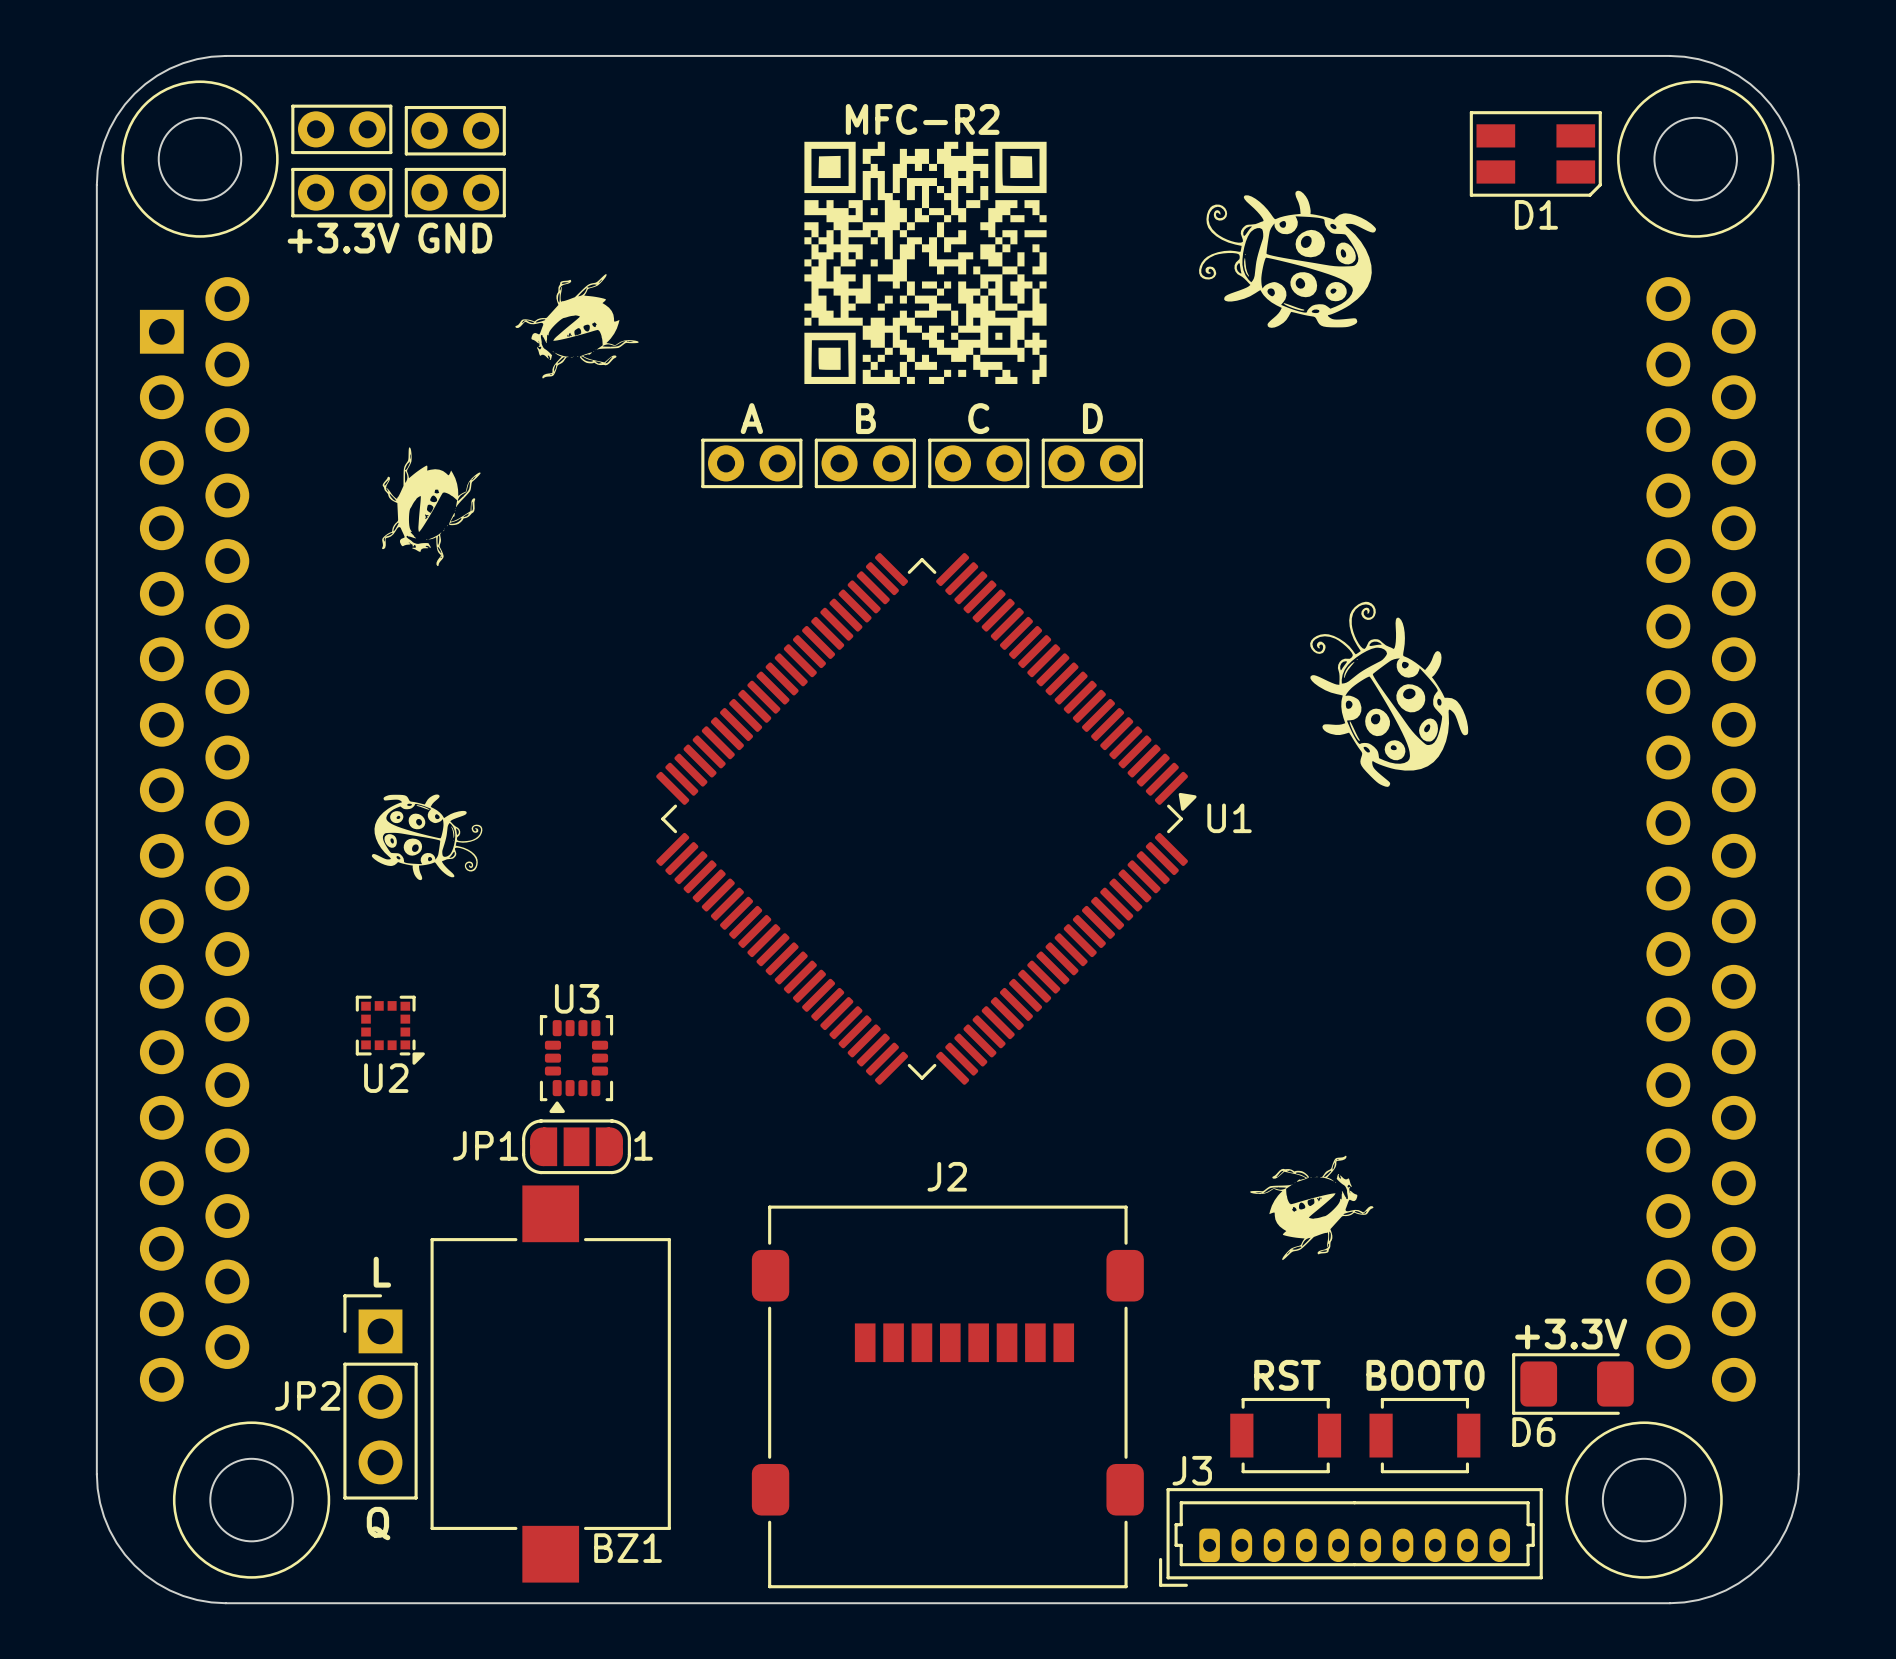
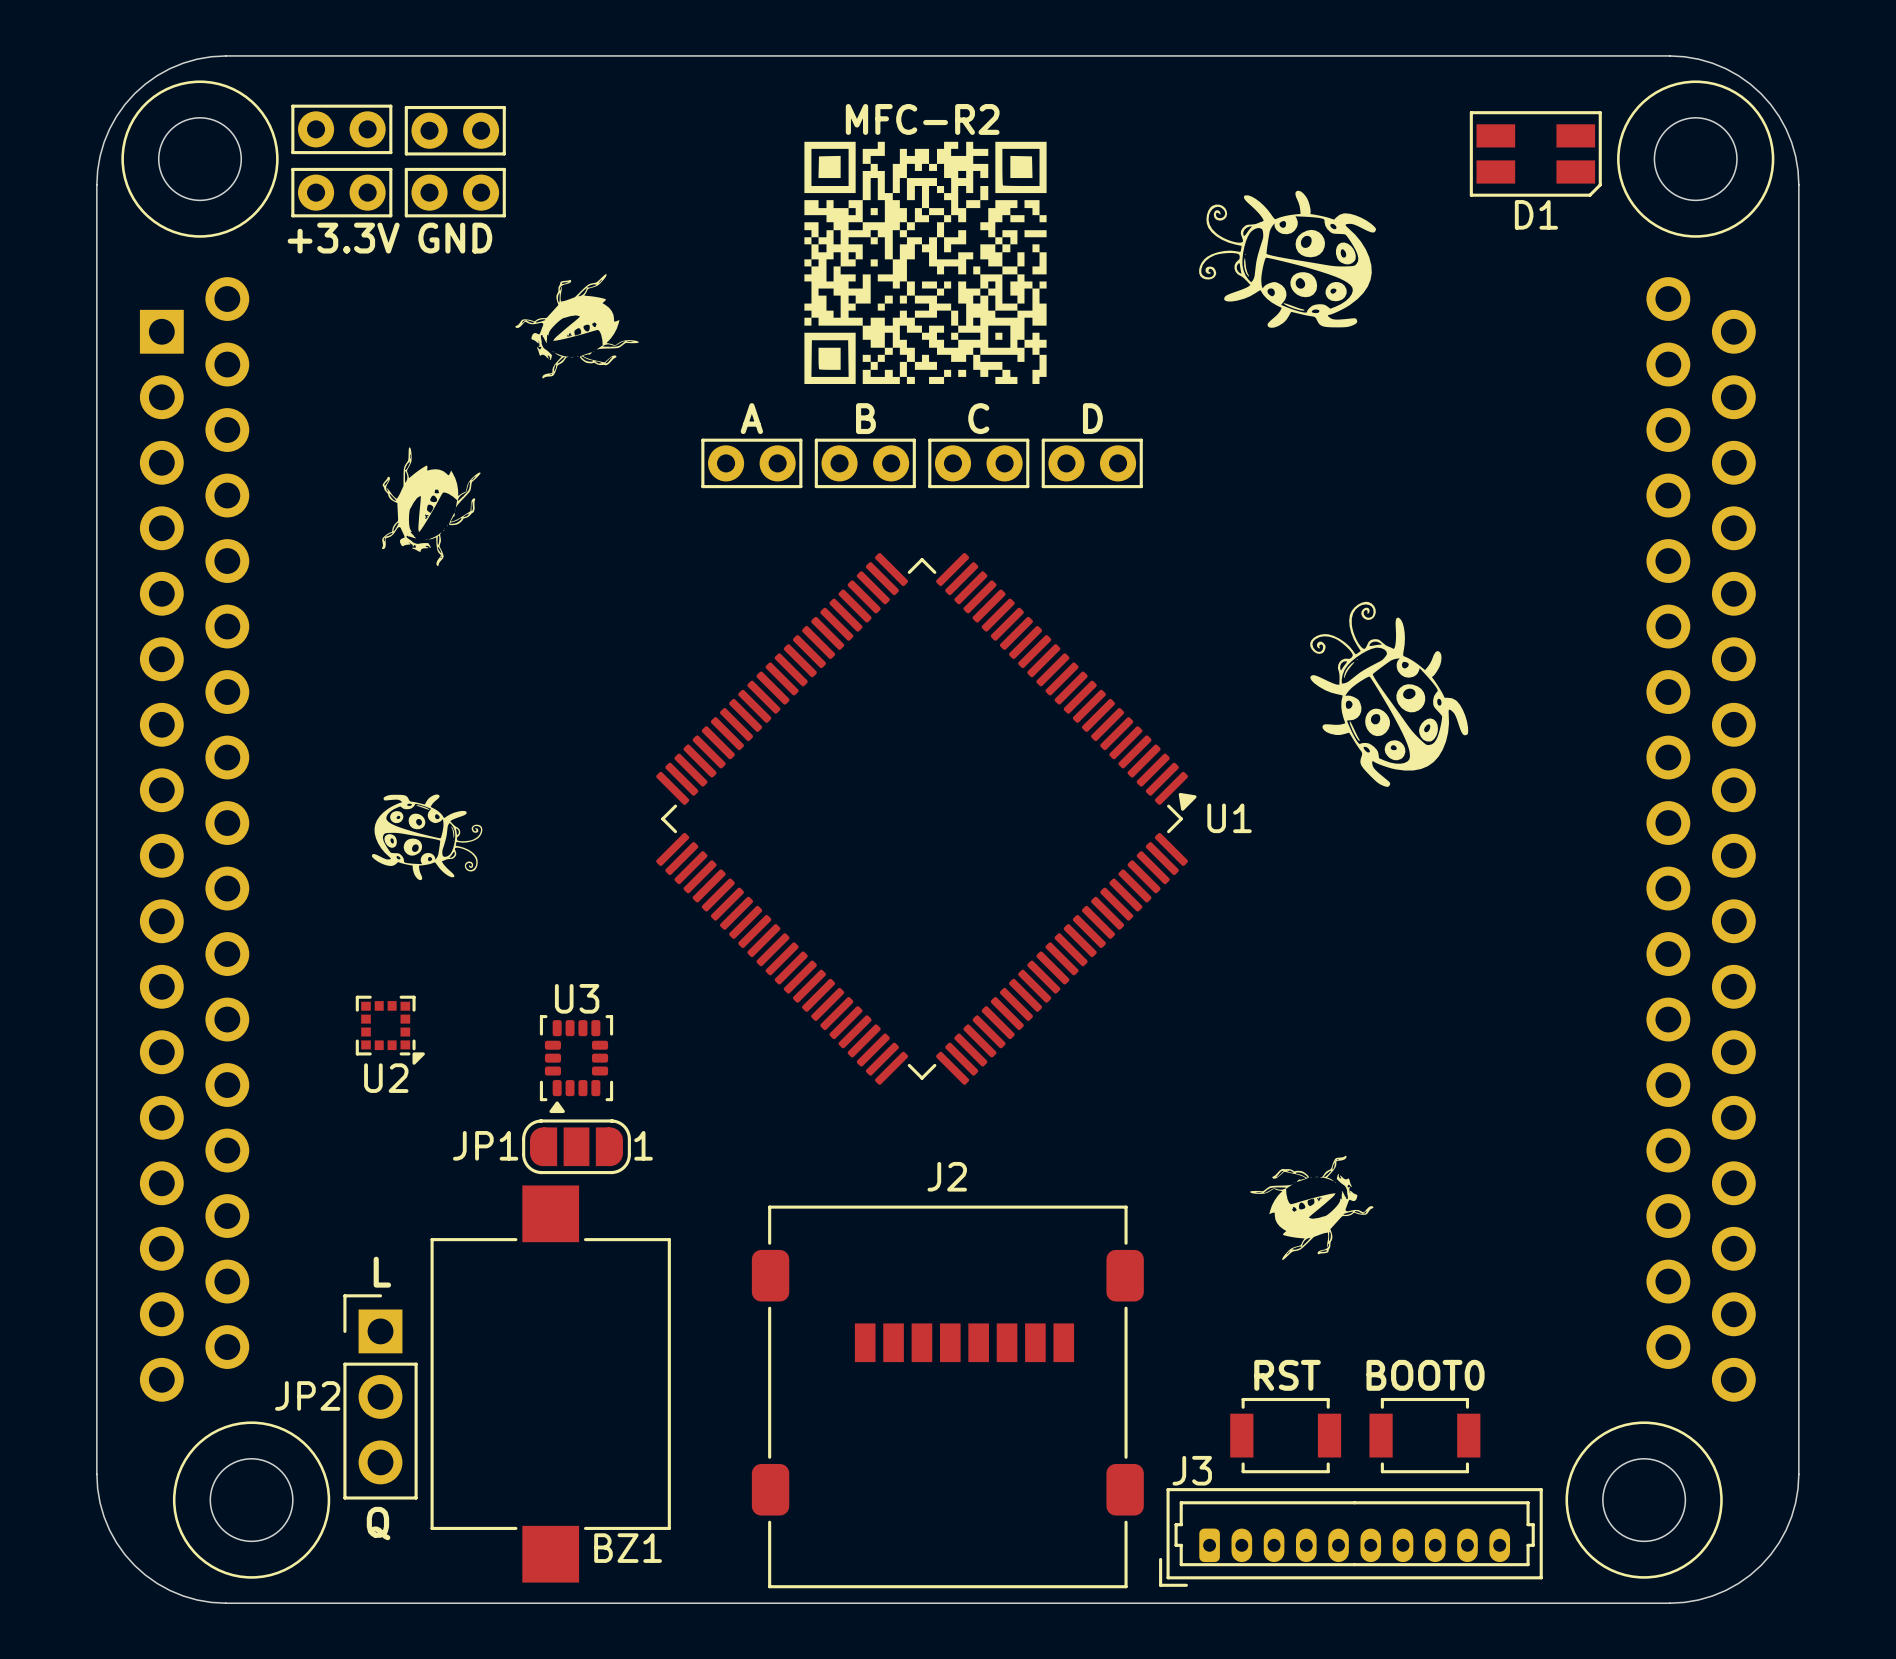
text: +3.3V (1571, 1334) -> none
D6: (1572, 1384) -> none

